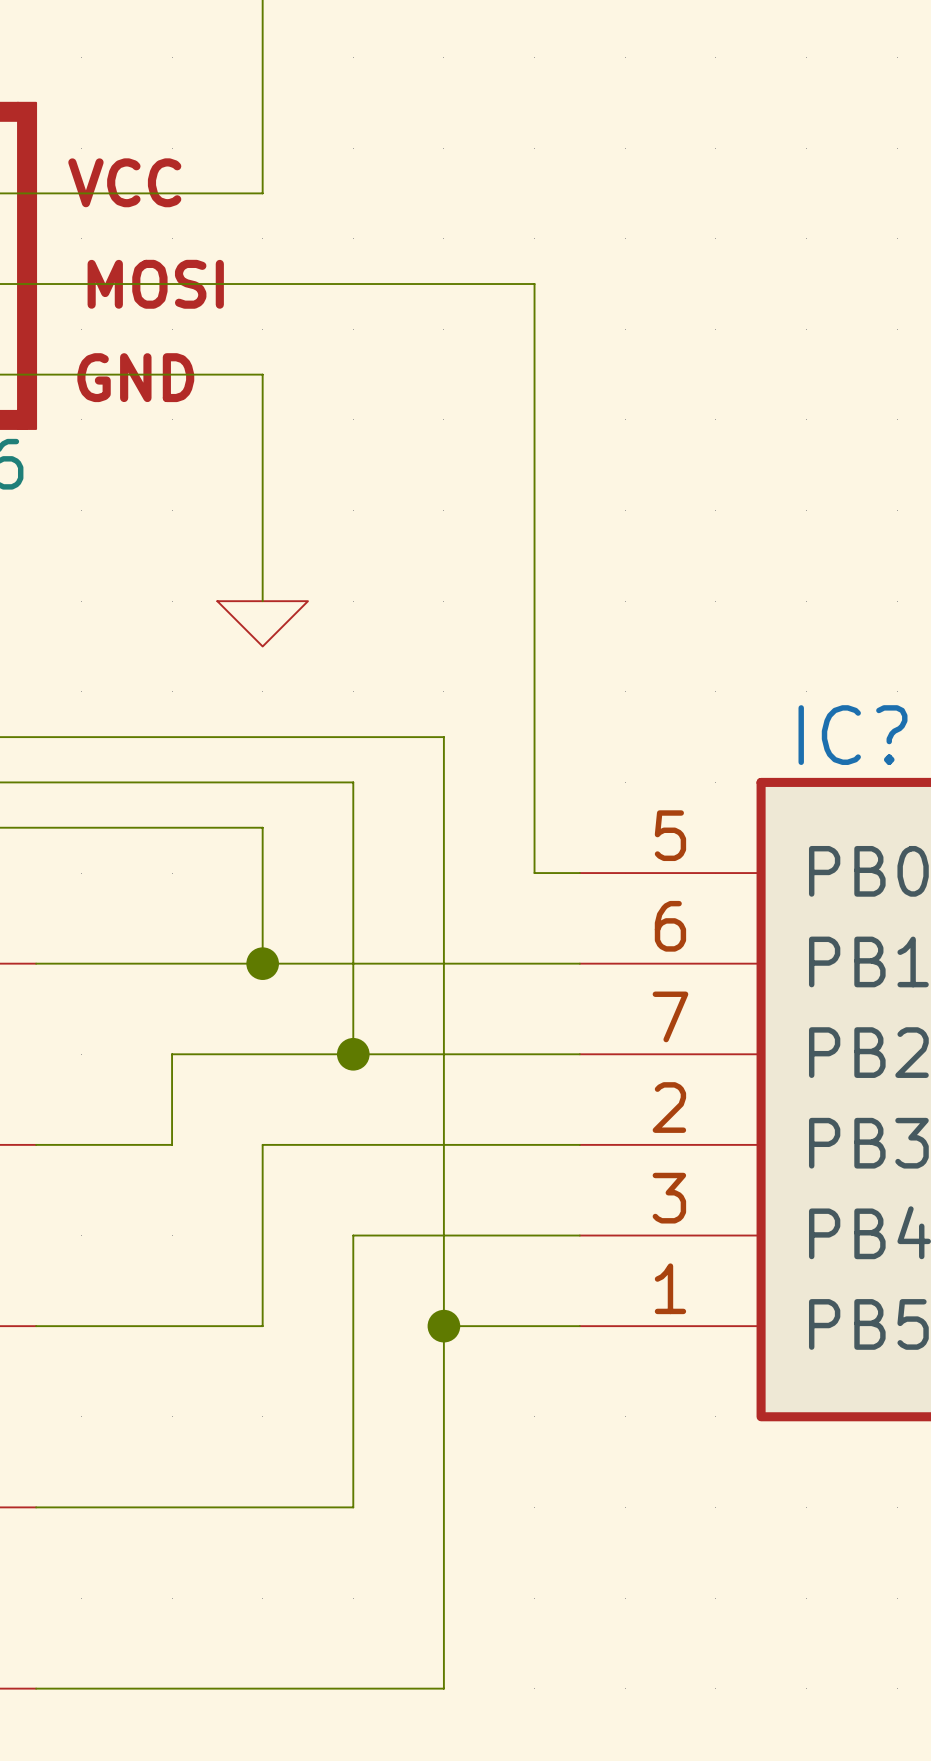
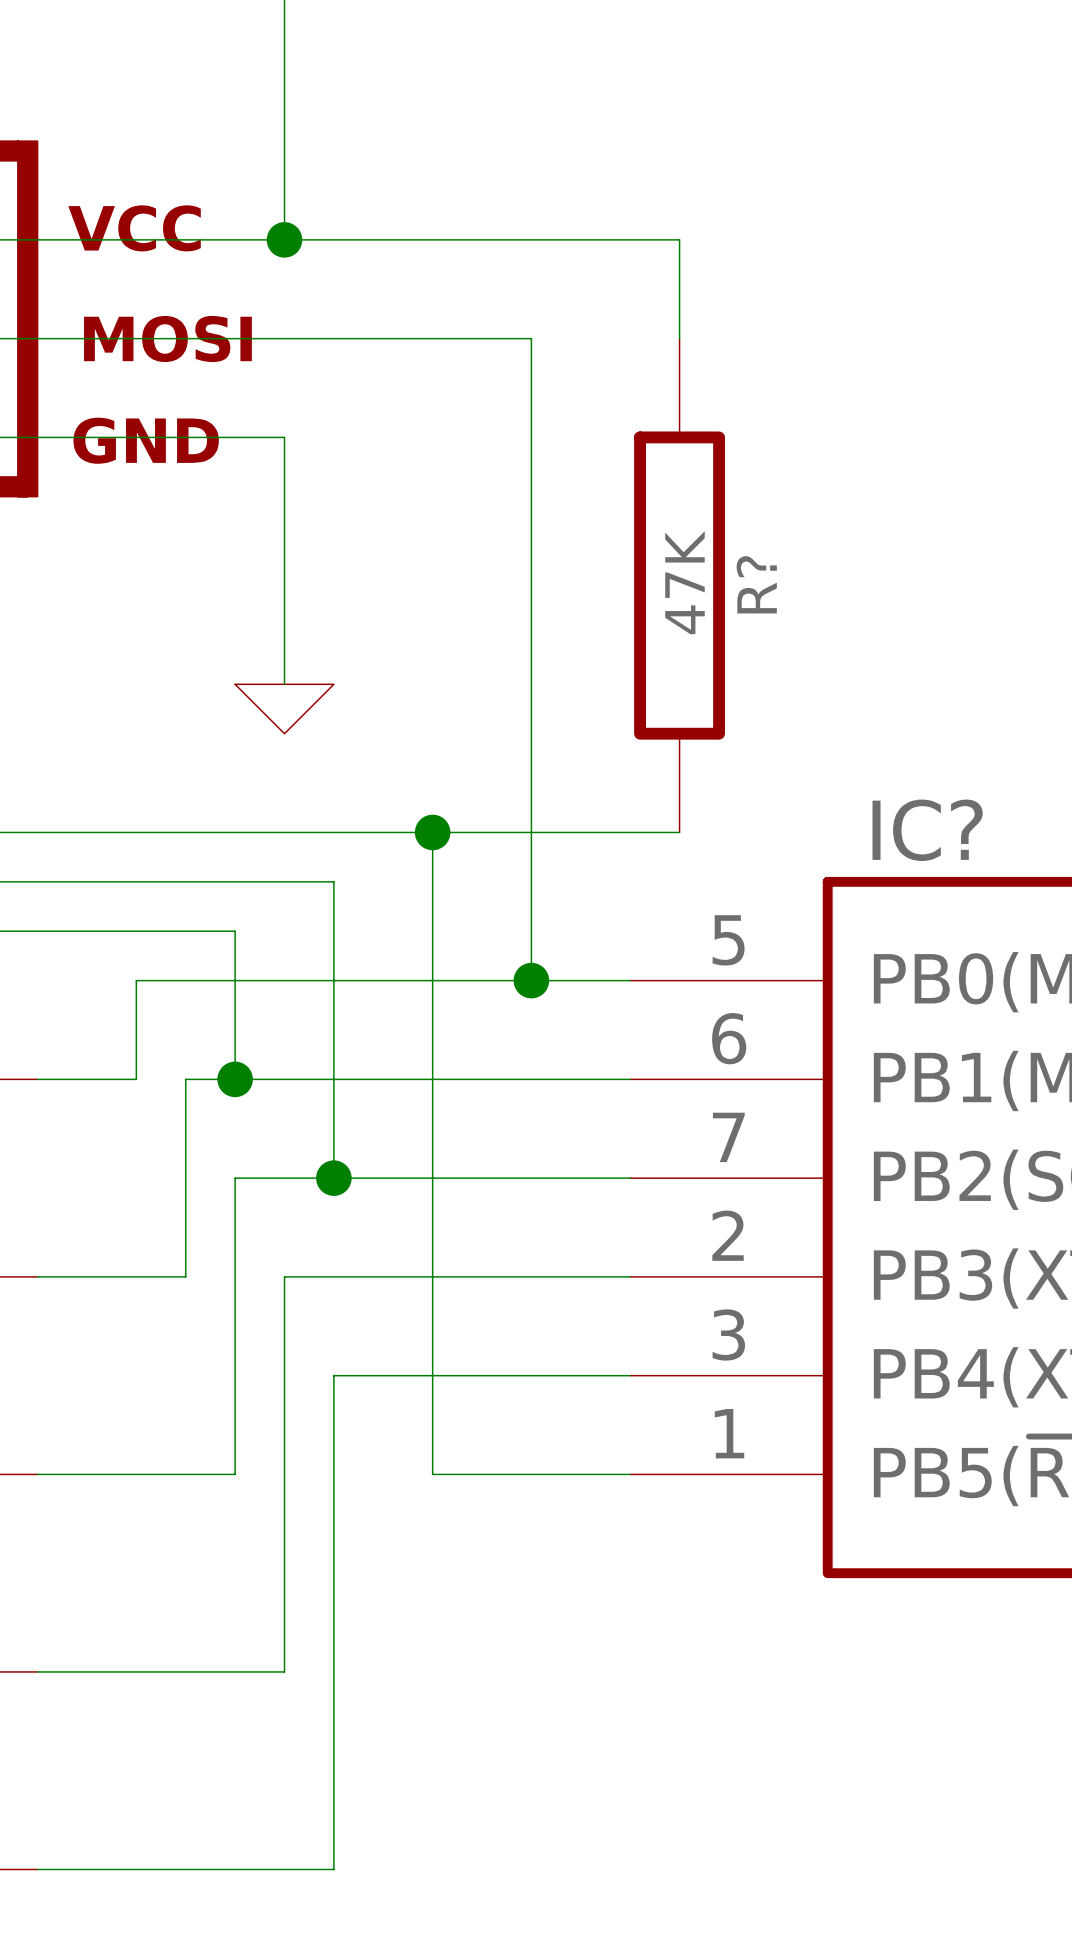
wire: none -> (284, 239) (679, 239) (679, 338)
junction: none -> (284, 239)
wire: (489, 284) (534, 284) (534, 873) -> (531, 338) (531, 980)
R?: none -> 47K (679, 585)
wire: none -> (432, 832) (432, 1474) (482, 1474)
junction: none -> (432, 832)
wire: (443, 737) (443, 1688) (307, 1688) -> (383, 1375) (333, 1375) (333, 1869)
wire: none -> (482, 832) (679, 832)
wire: (307, 782) (353, 782) (353, 1054) -> (333, 881) (333, 1178)
wire: (217, 827) (262, 827) (262, 963) -> (235, 931) (235, 1079)
junction: none -> (531, 980)
wire: none -> (580, 980) (136, 980) (136, 1079)
wire: (126, 963) (172, 963) -> (185, 1178) (185, 1079)
junction position: (262, 963) -> (235, 1079)
wire: (172, 1054) (217, 1054) -> none
junction position: (353, 1054) -> (333, 1178)
wire: (353, 1235) (353, 1507) (262, 1507) -> (284, 1474) (284, 1671)
wire: (217, 1326) (262, 1326) -> (235, 1474) (235, 1178)
junction: (443, 1326) -> none

